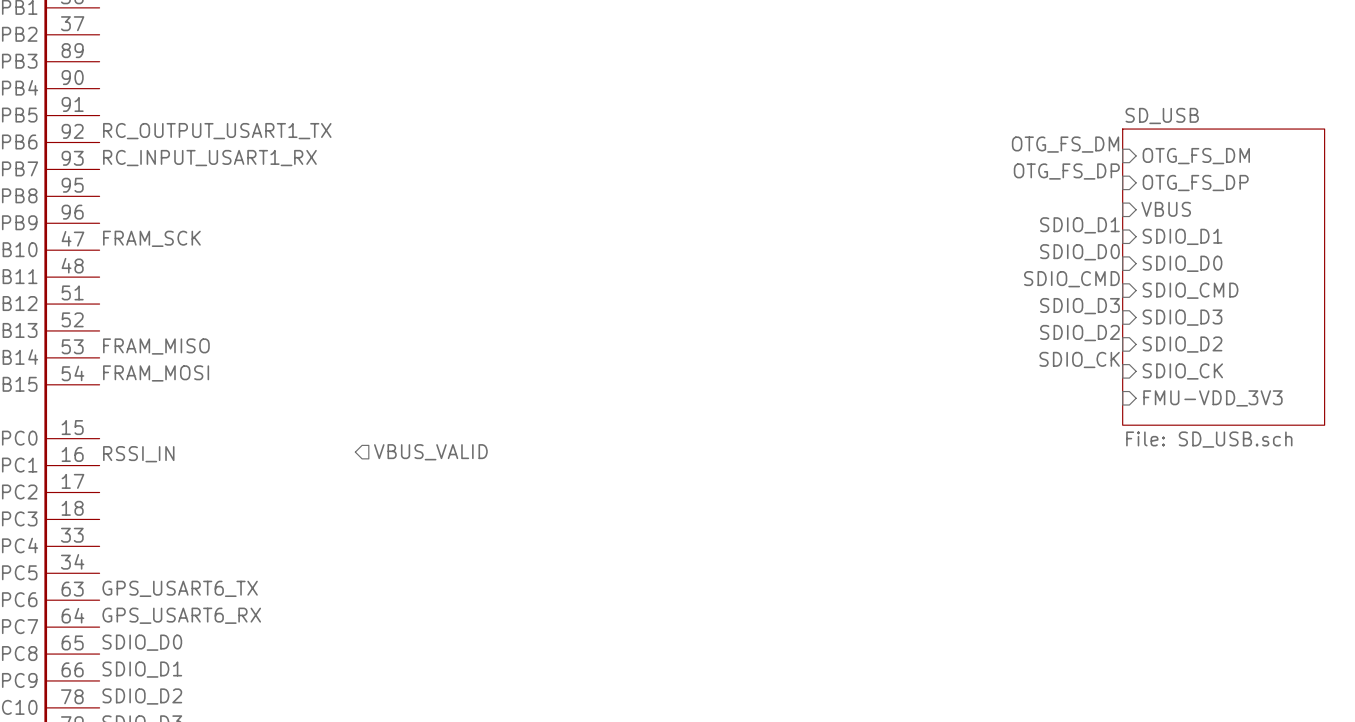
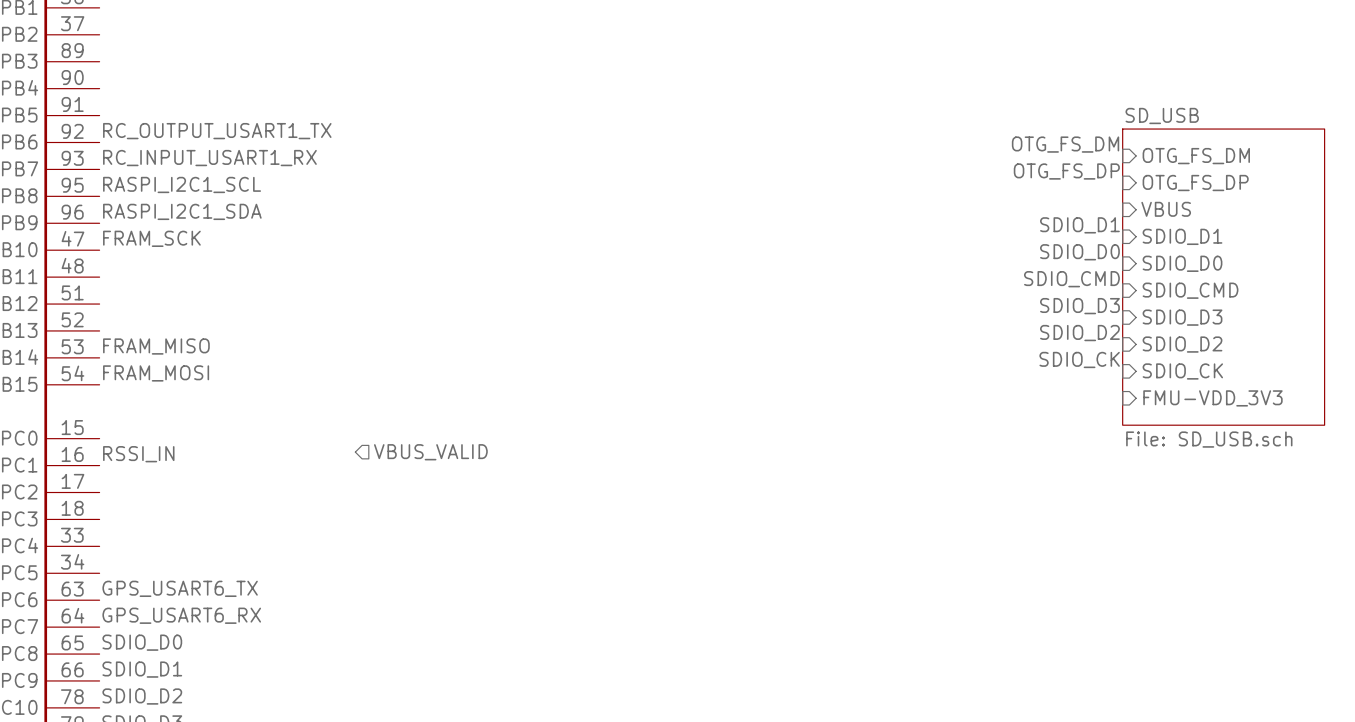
label: none -> RASPI_I2C1_SCL (182, 184)
label: none -> RASPI_I2C1_SDA (182, 211)

